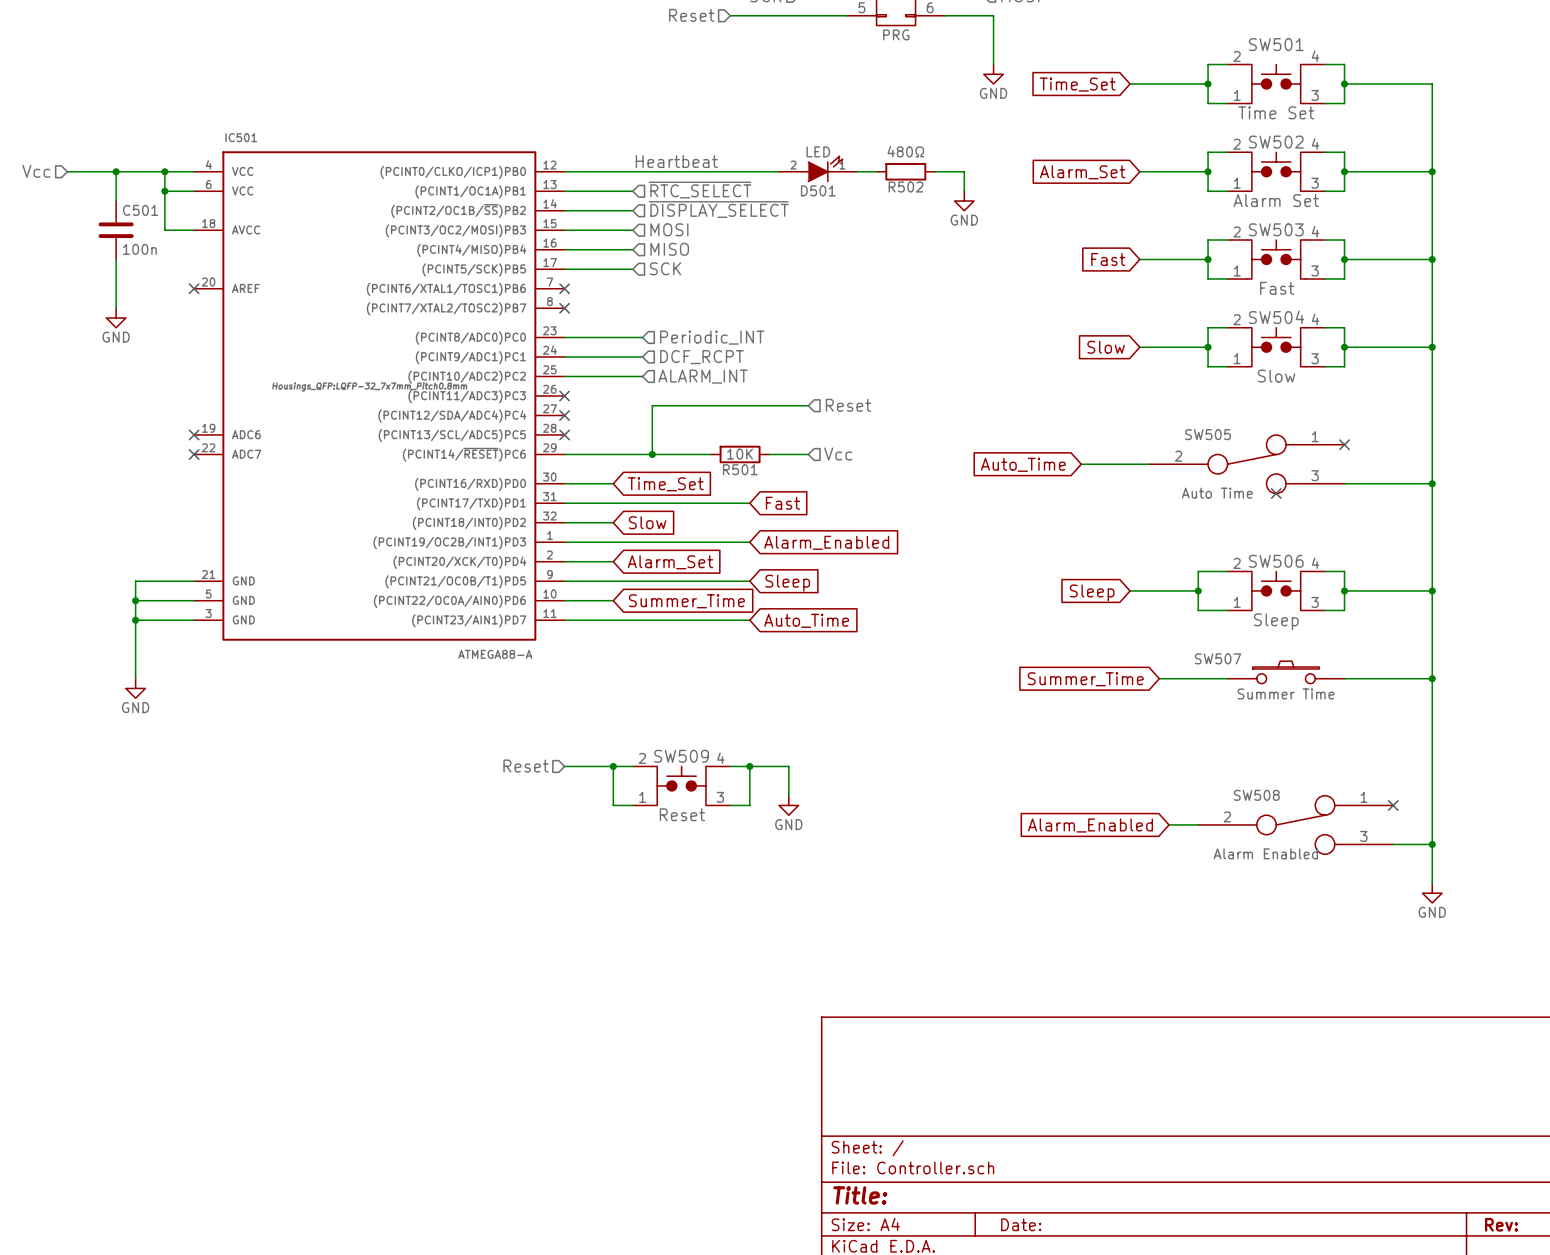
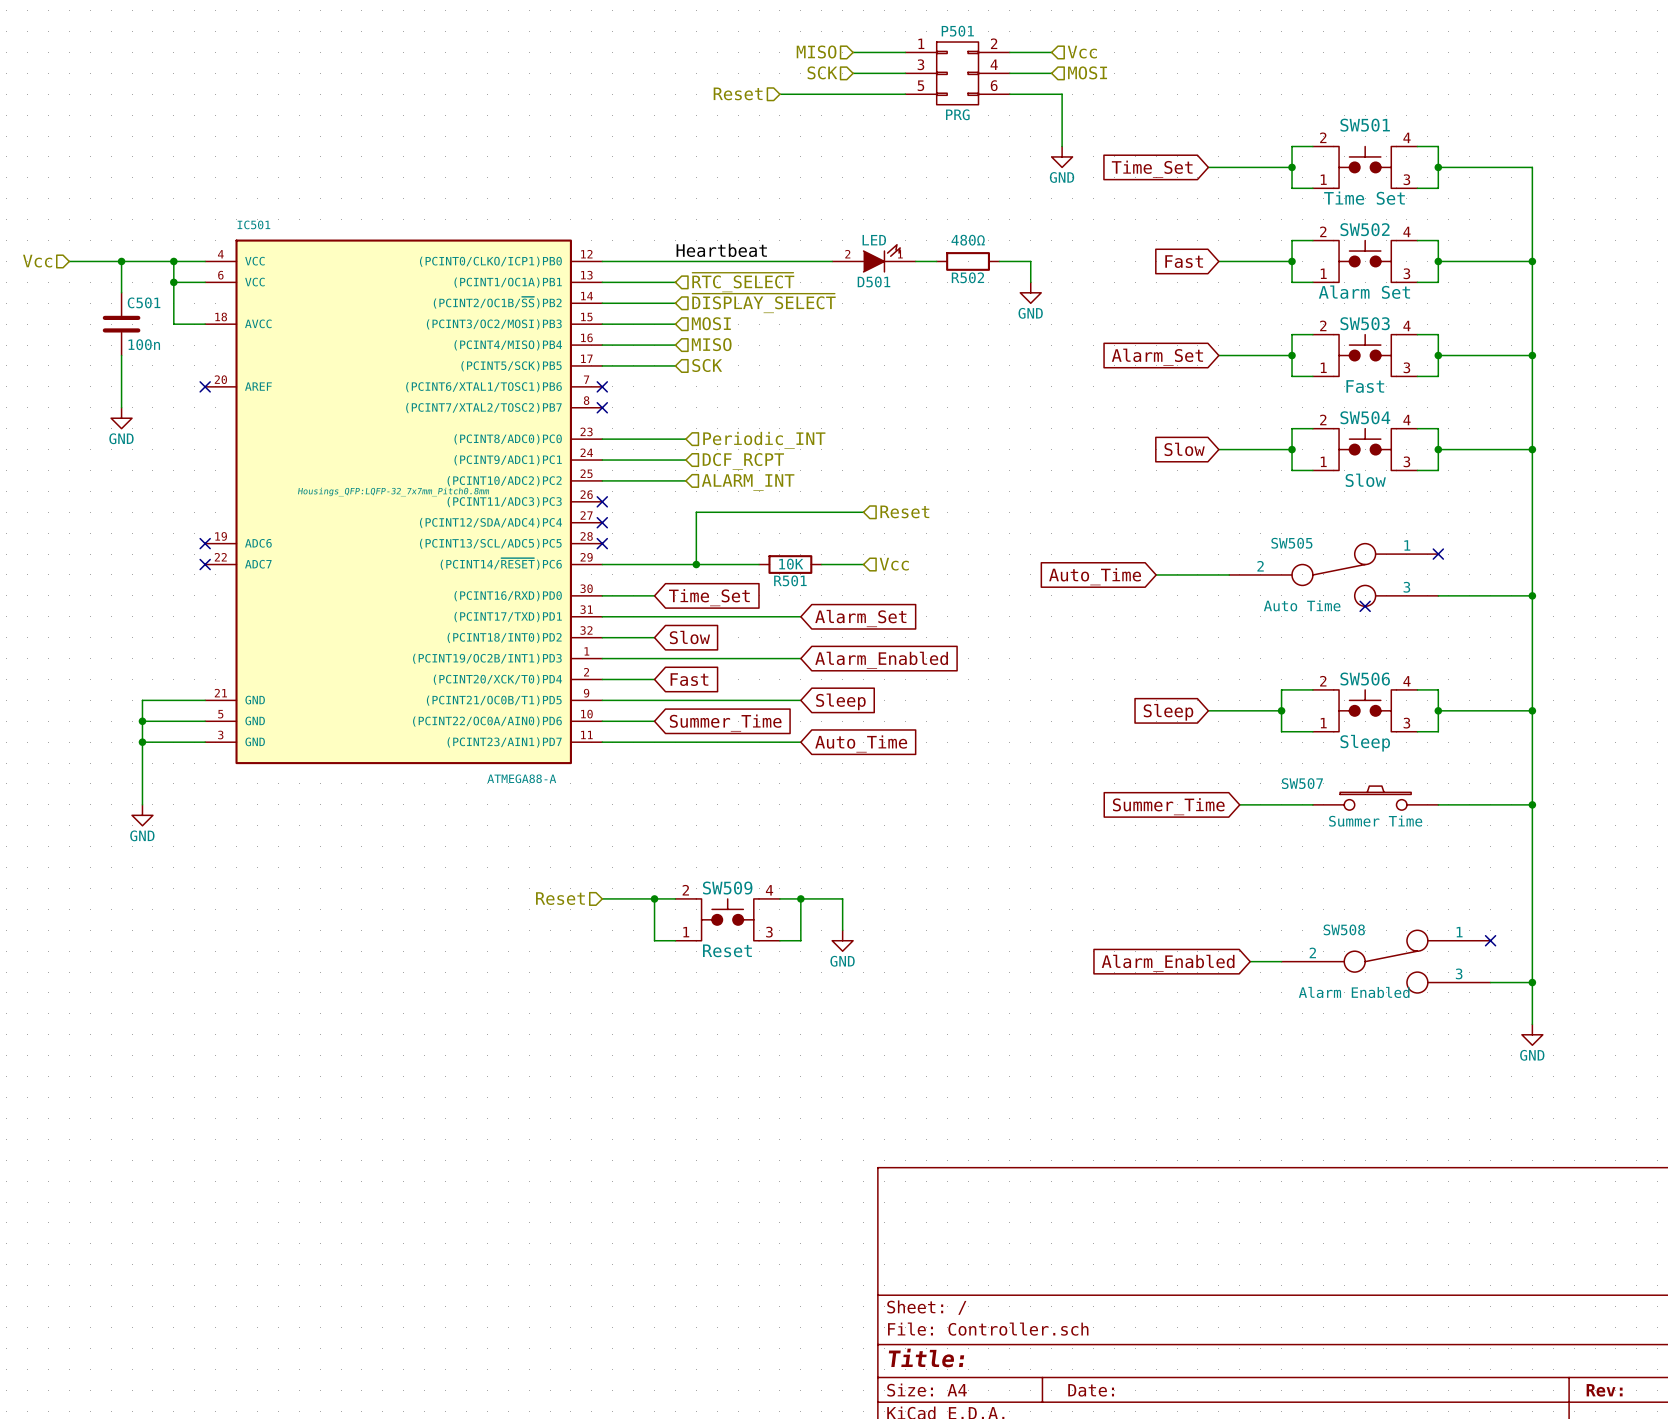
global label: Alarm_Set (1082, 172) -> Fast (1184, 261)
global label: Fast (1108, 259) -> Alarm_Set (1157, 357)
global label: Fast (782, 503) -> Alarm_Set (860, 618)
global label: Alarm_Set (670, 562) -> Fast (689, 679)

